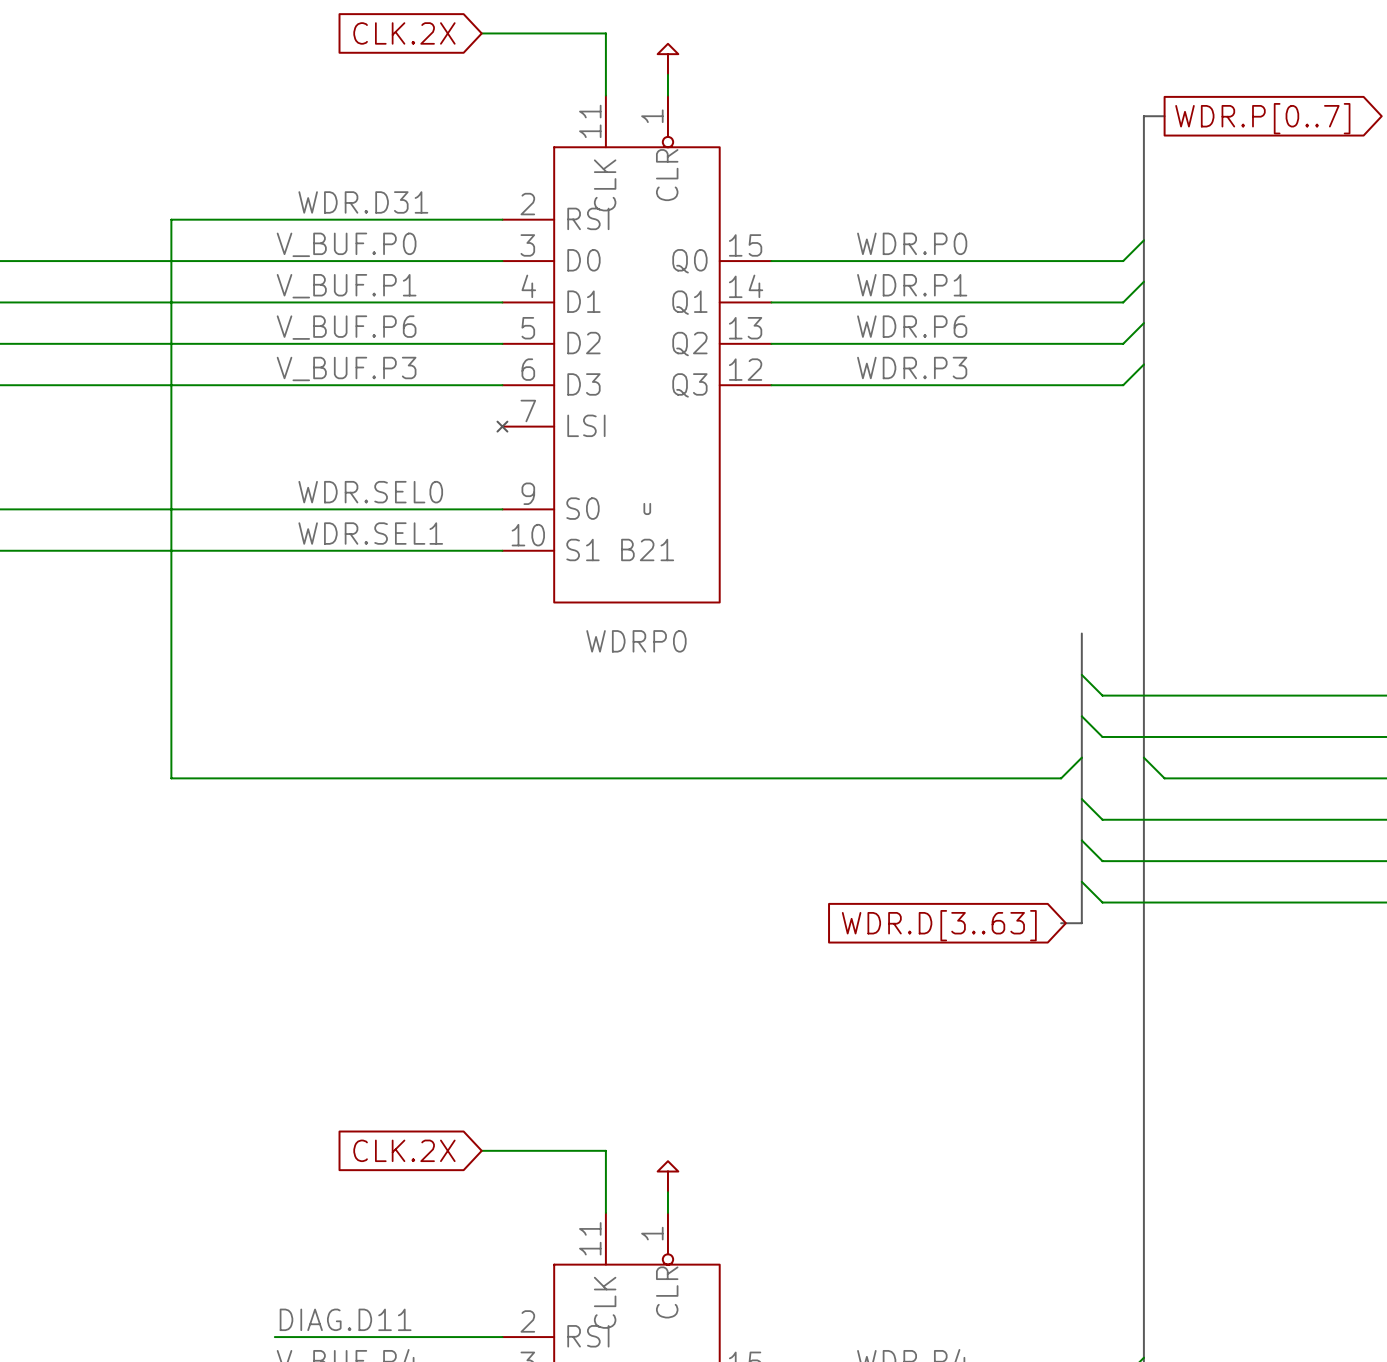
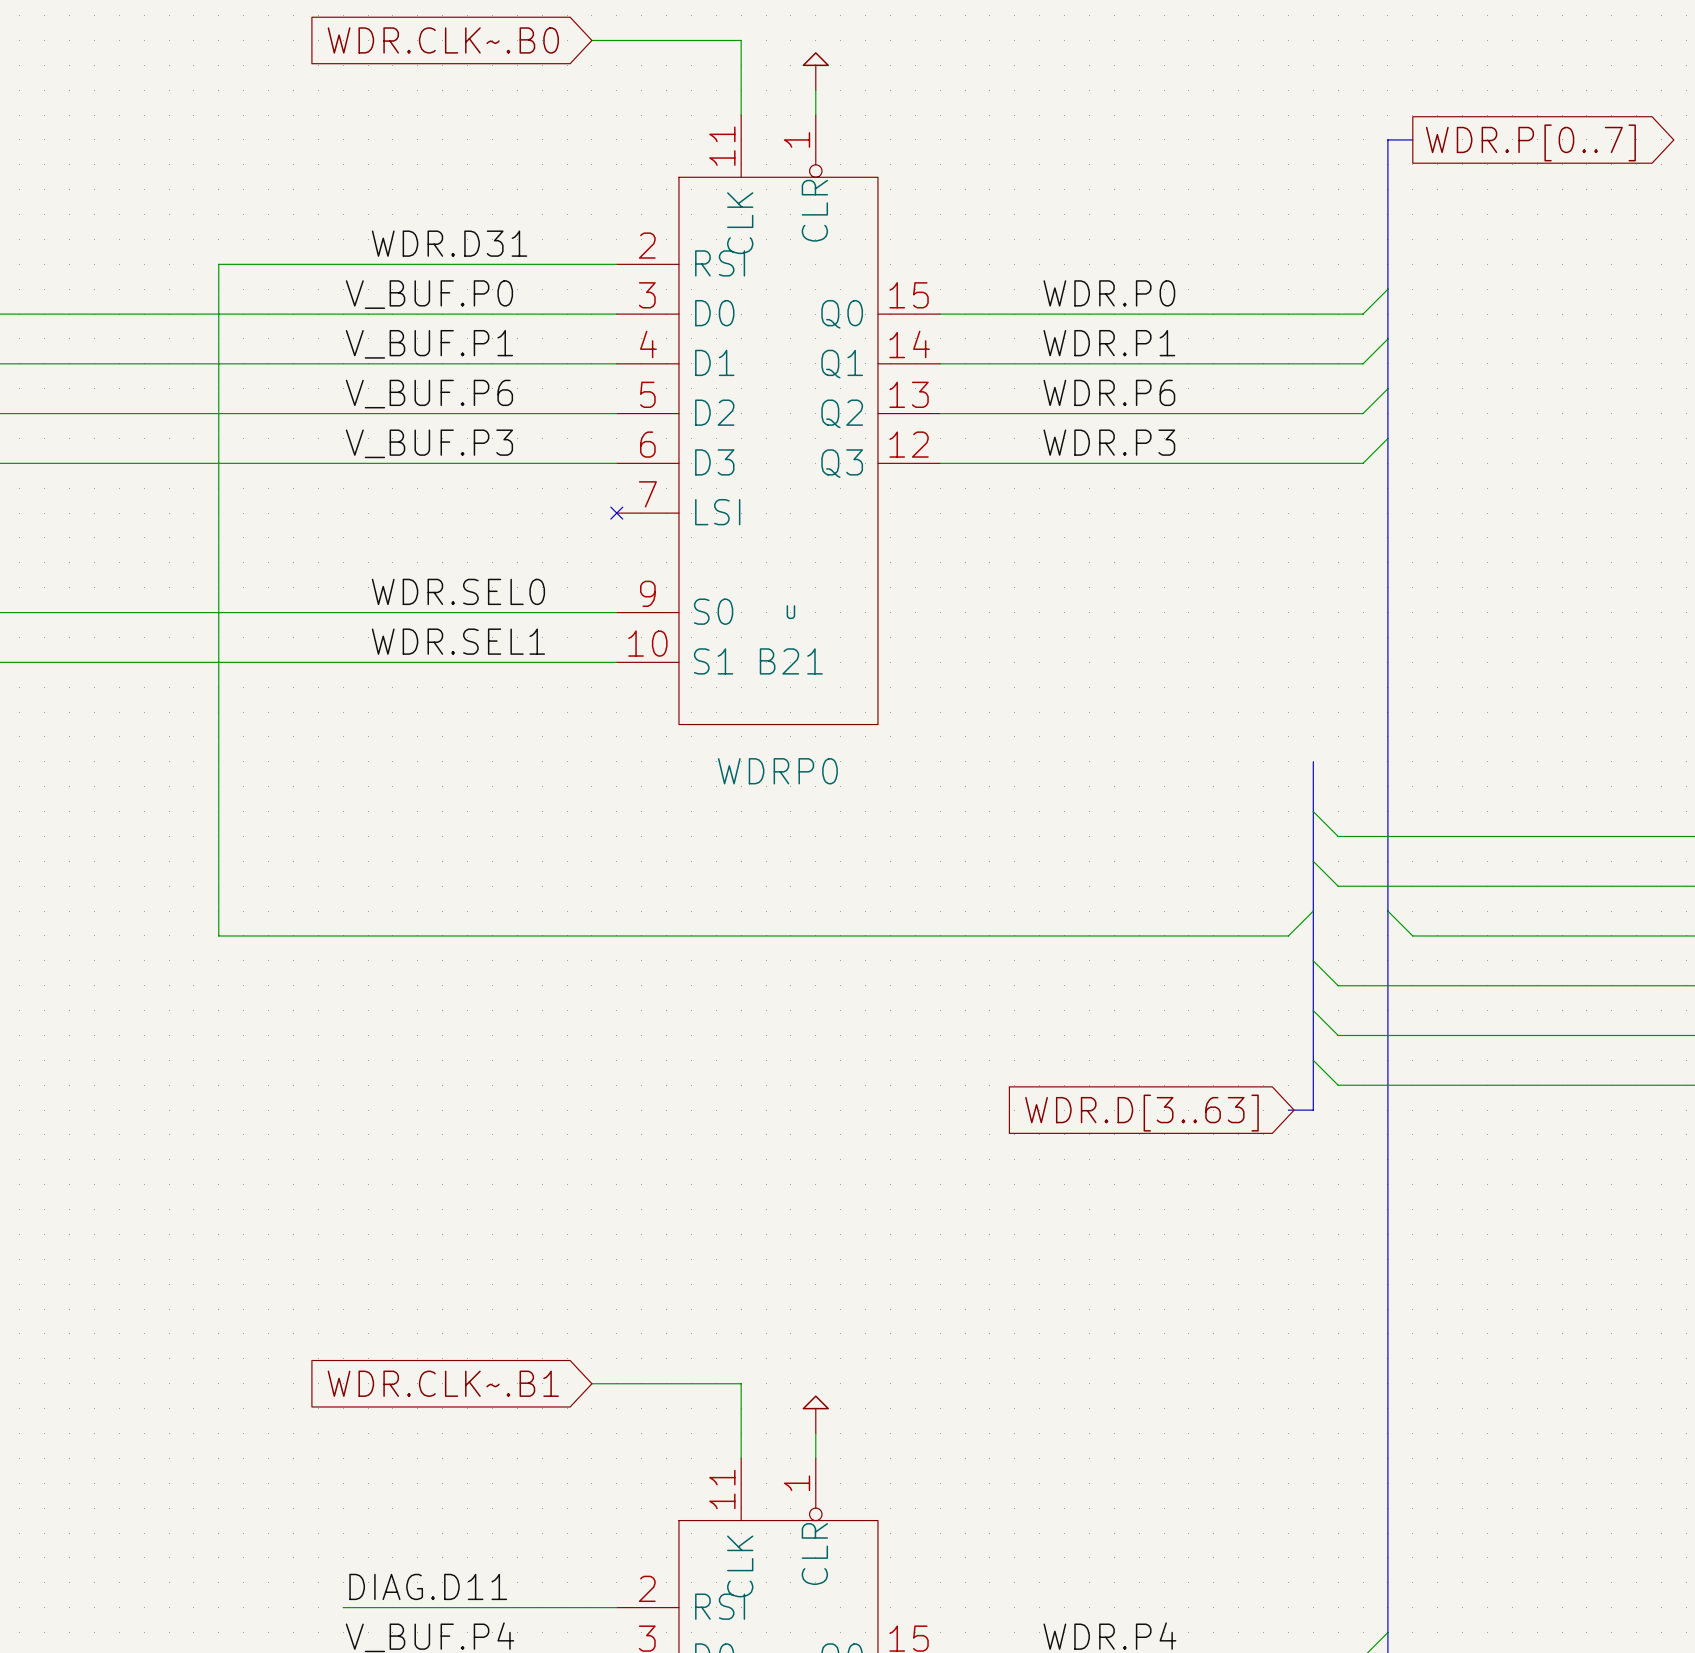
global label: CLK.2X (404, 33) -> WDR.CLK~.B0 (443, 40)
global label: CLK.2X (404, 1150) -> WDR.CLK~.B1 (443, 1383)

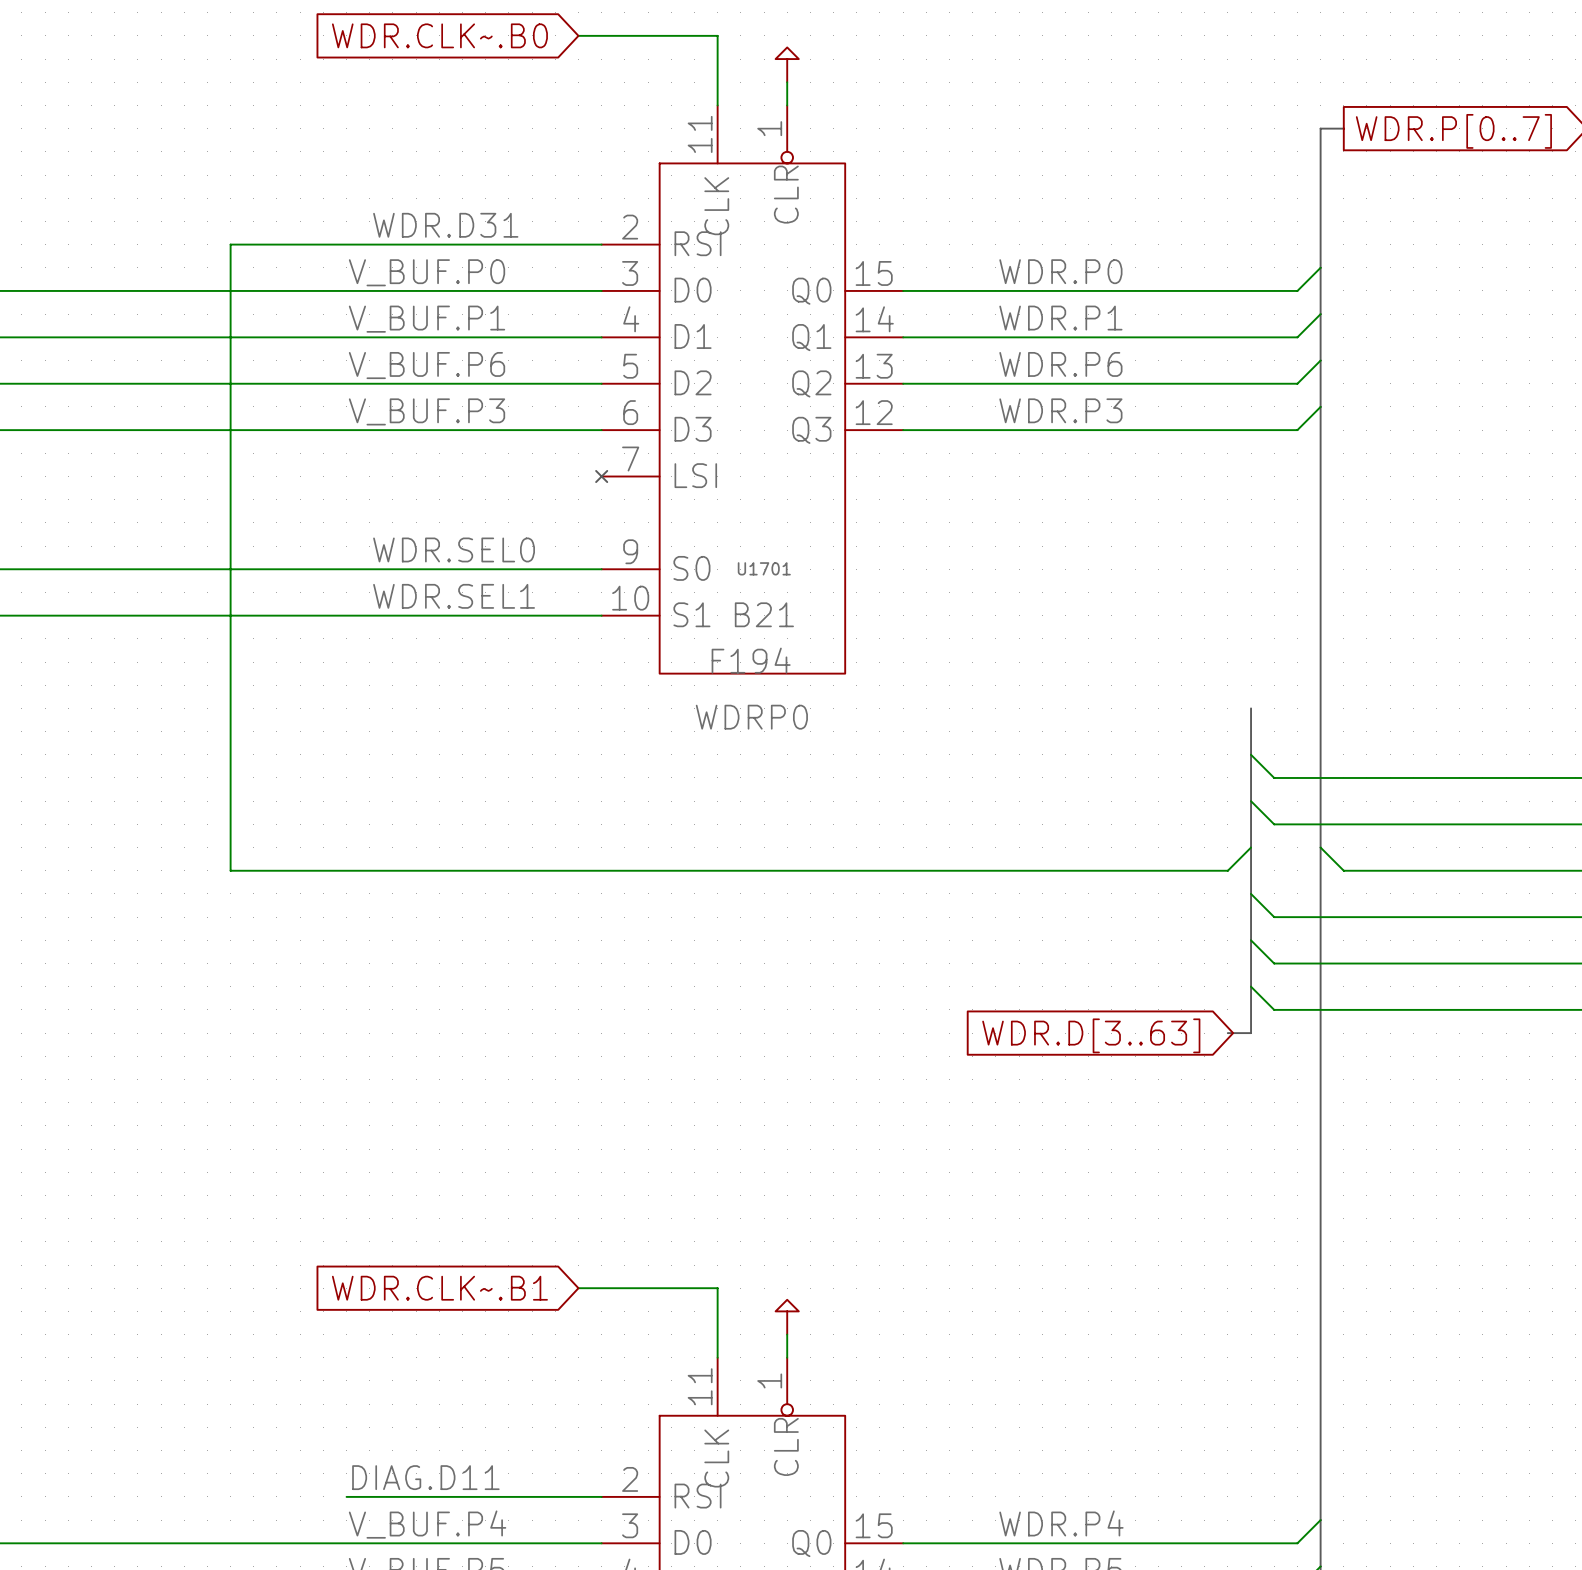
U name: U (790, 612) -> U1701 (764, 568)
U value: none -> F194 (751, 660)

